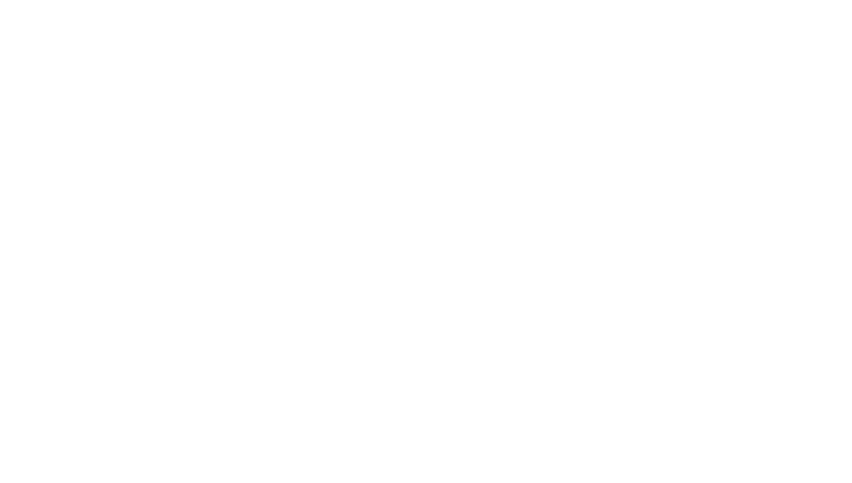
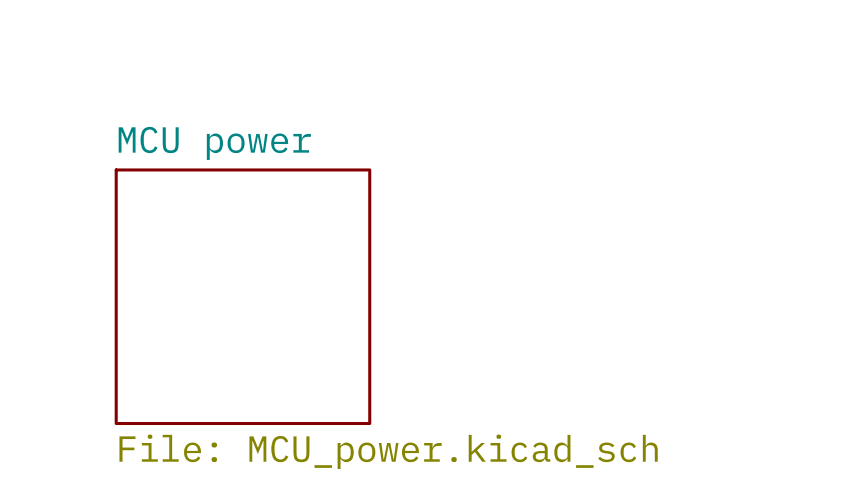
sheet MCU power: none -> File: MCU_power.kicad_sch (242, 296)

